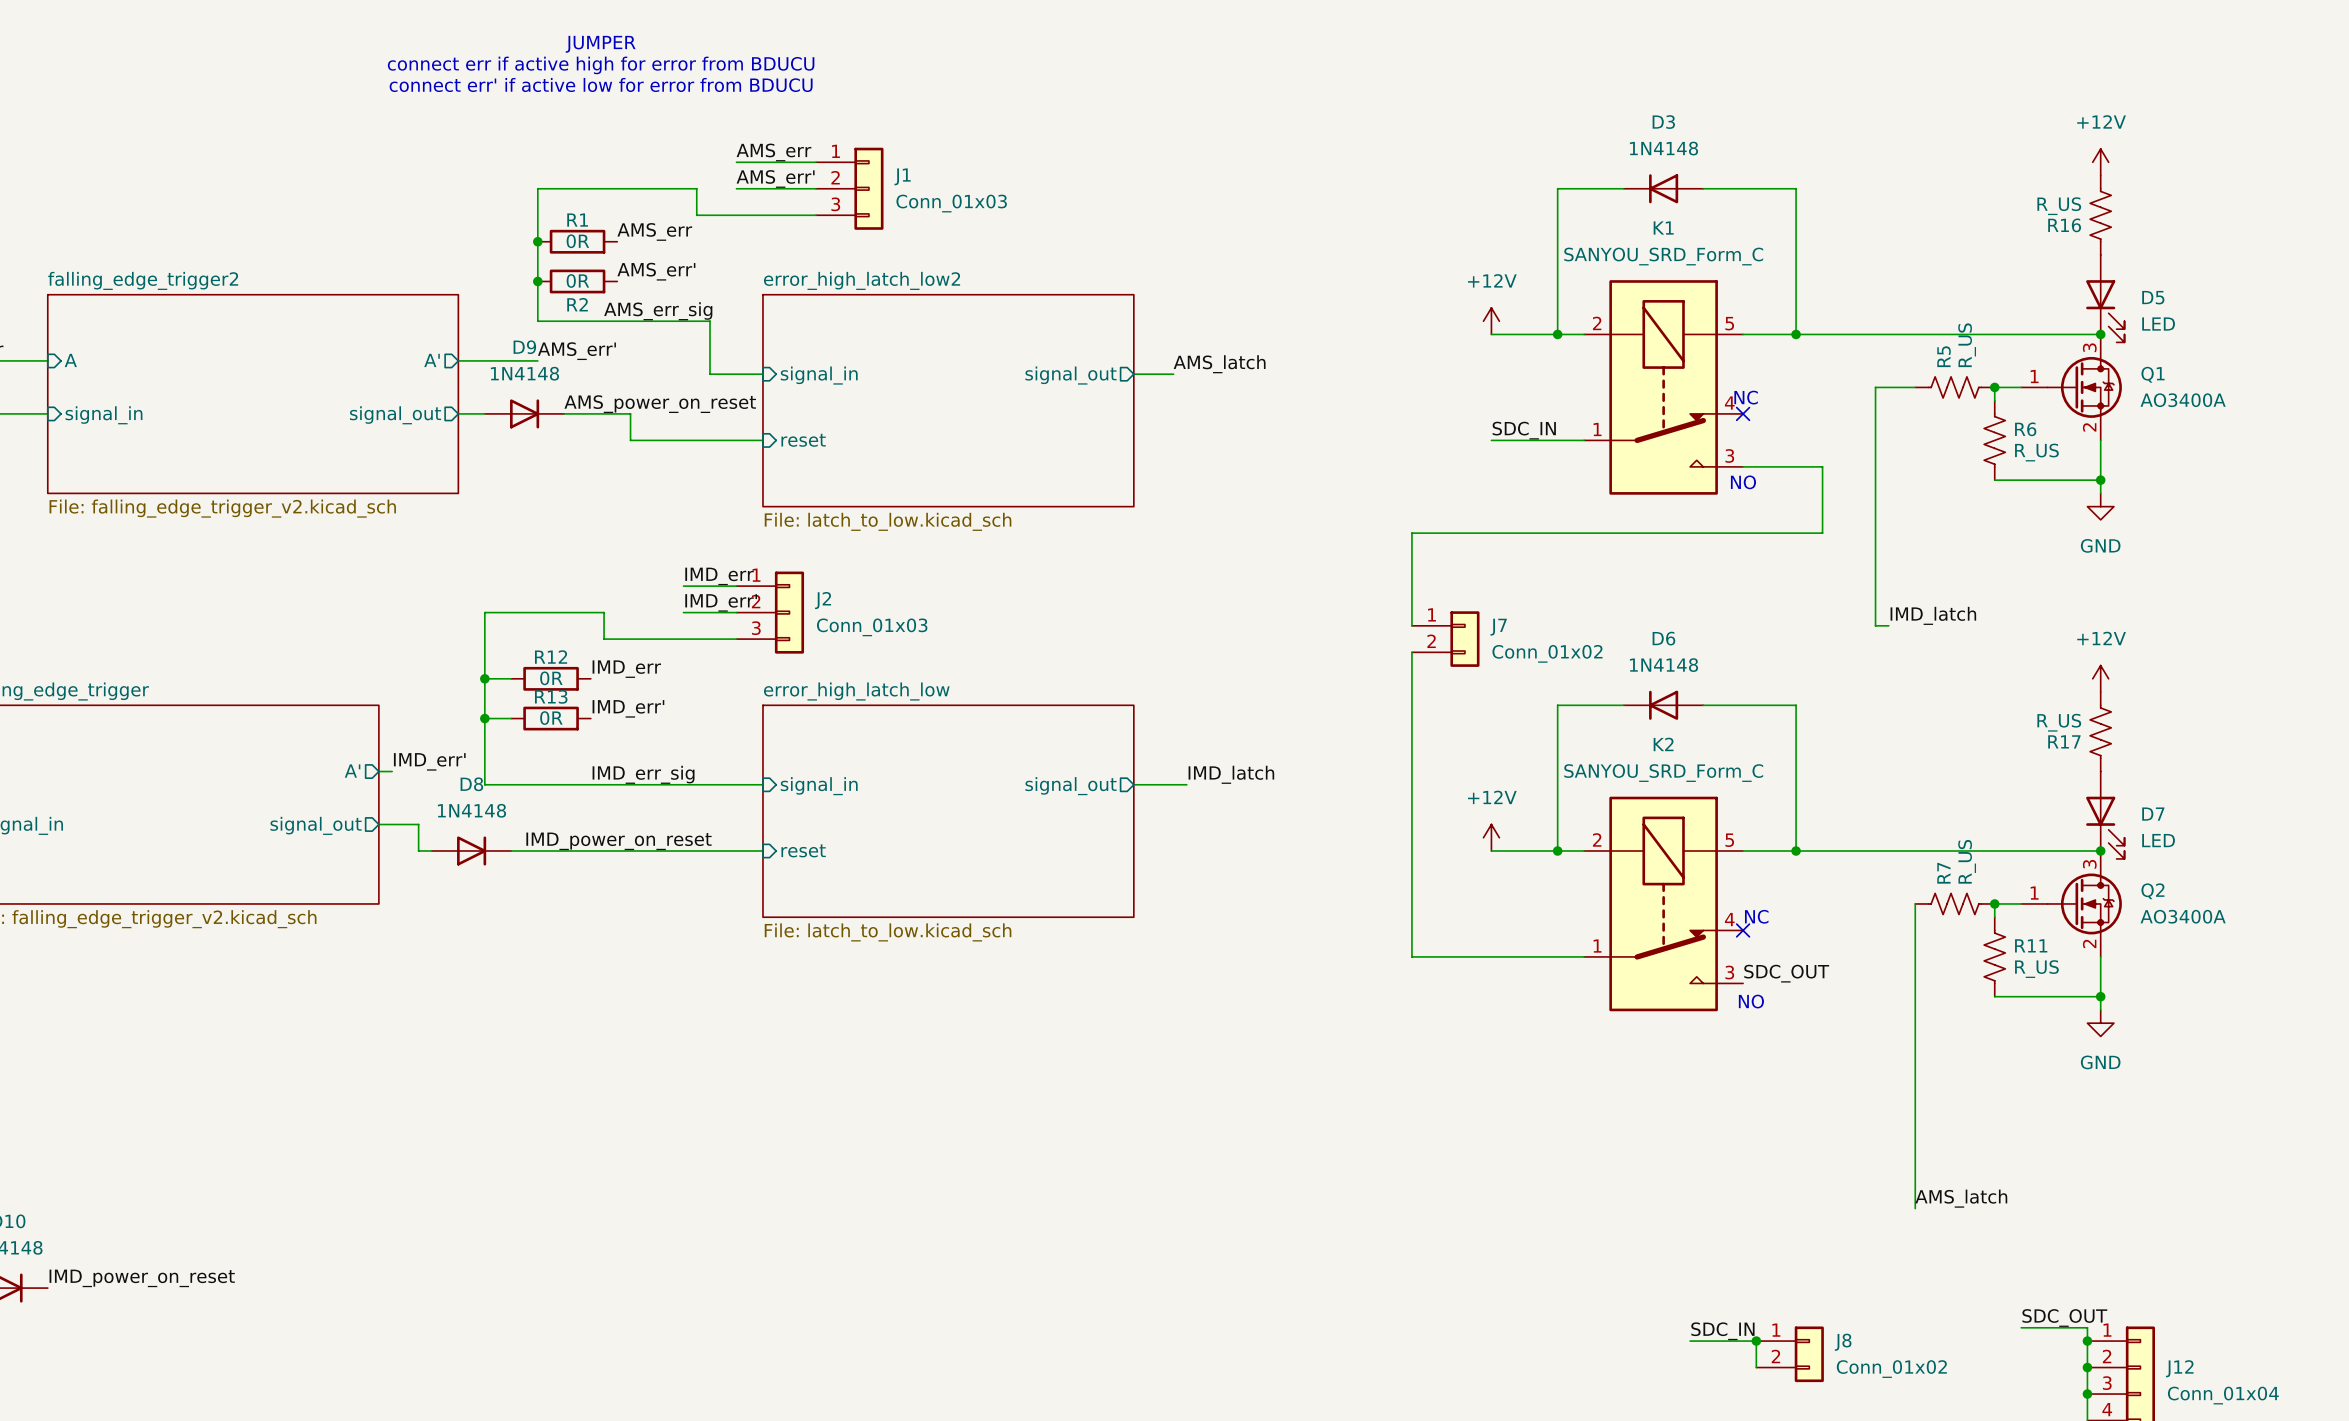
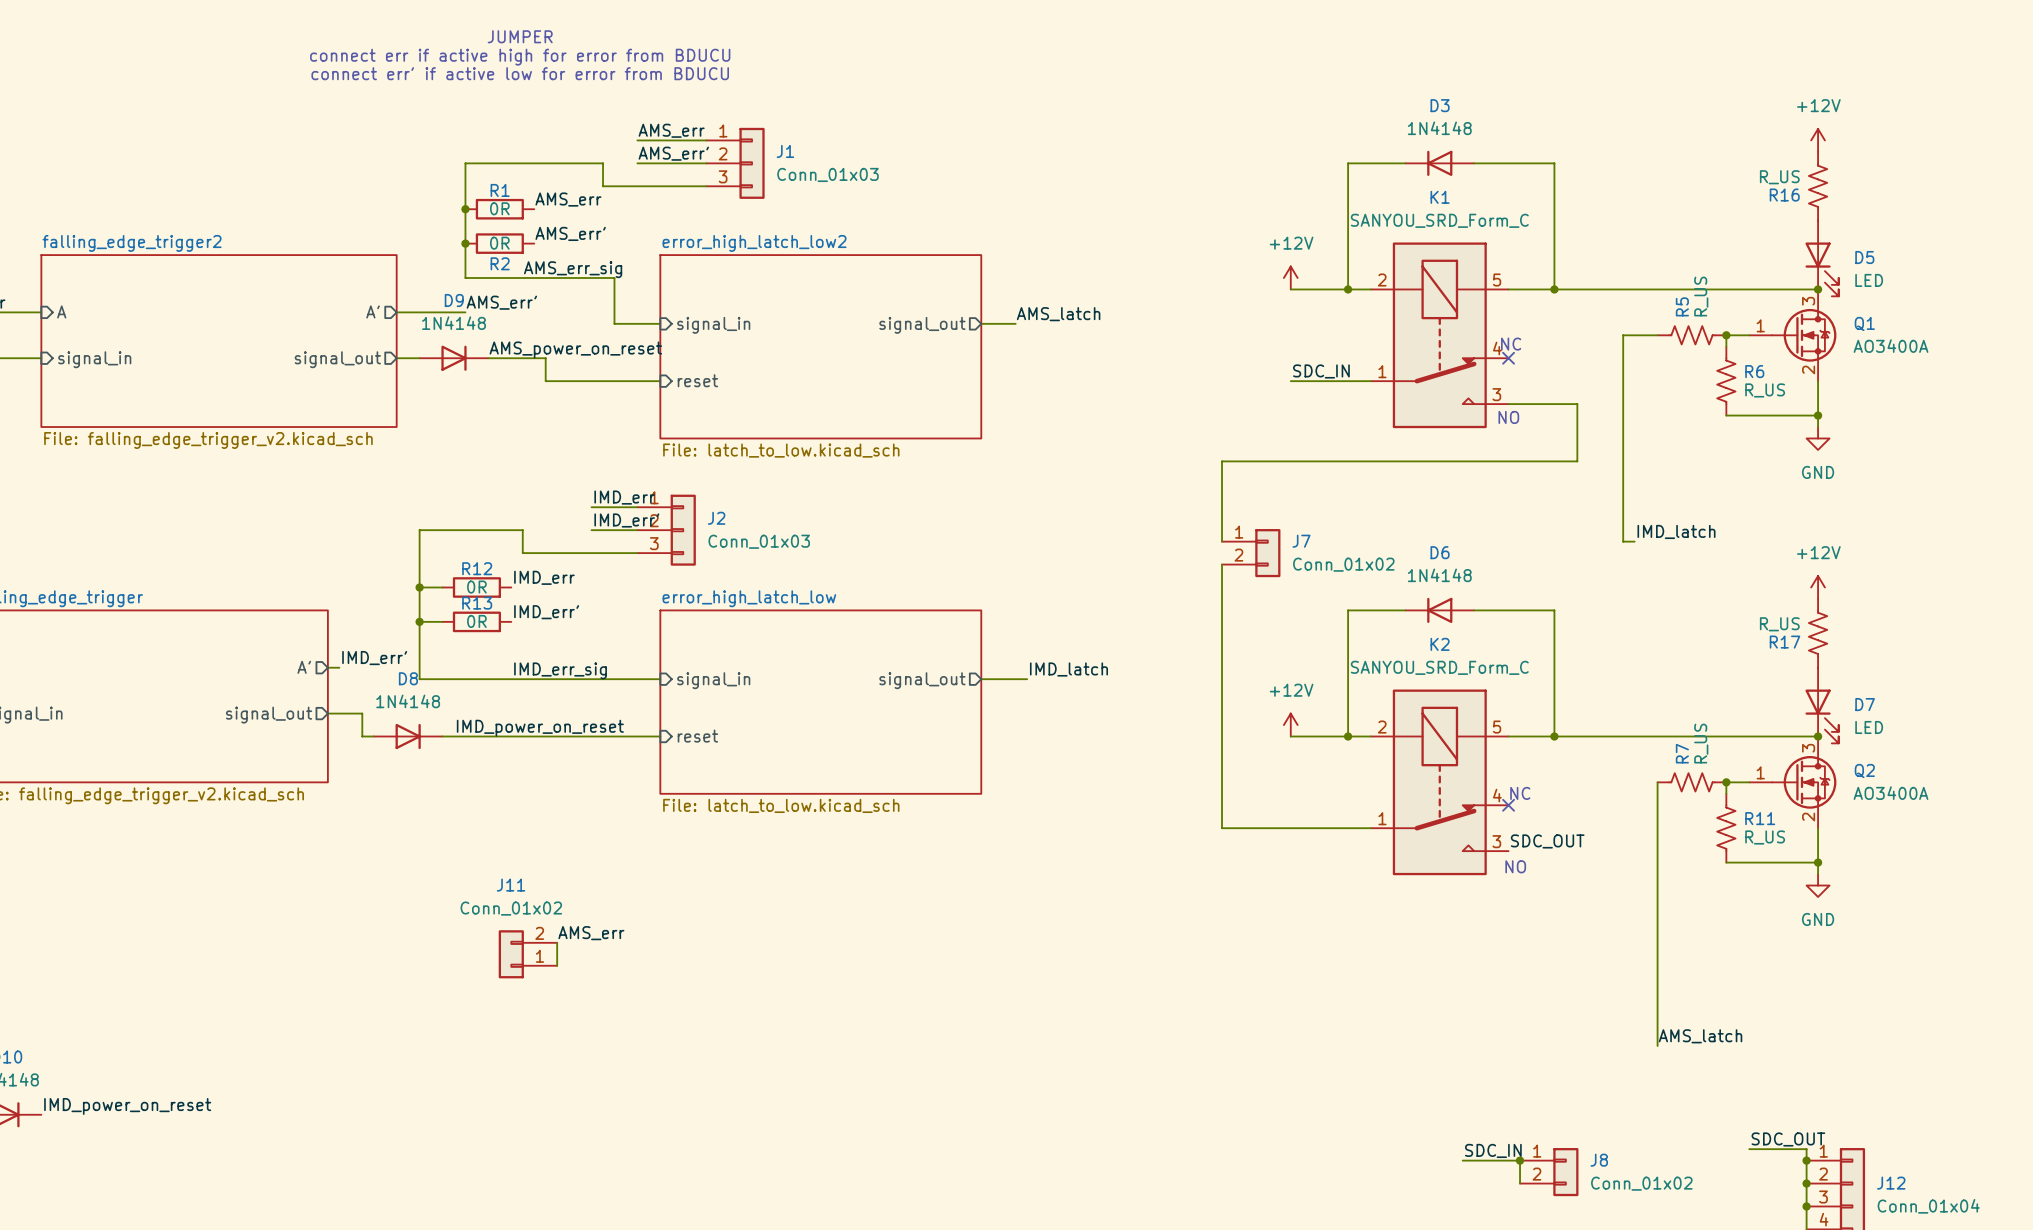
label: none -> AMS_err (591, 933)
wire: none -> (557, 942) (557, 965)
J11: none -> Conn_01x02 (527, 954)

